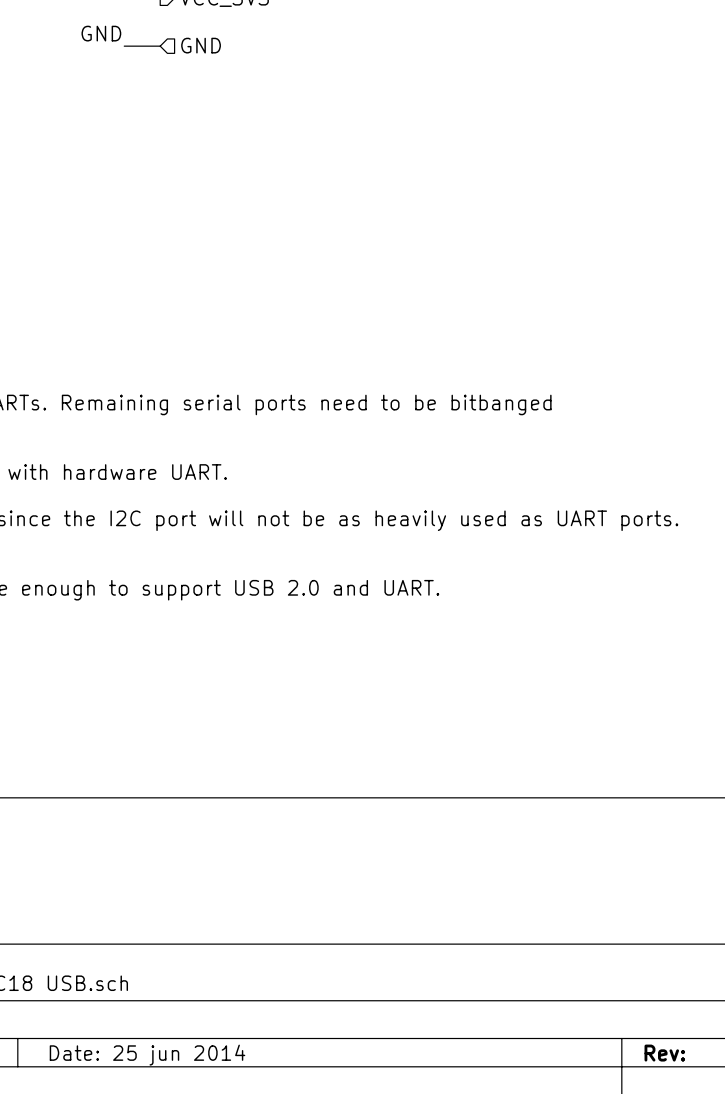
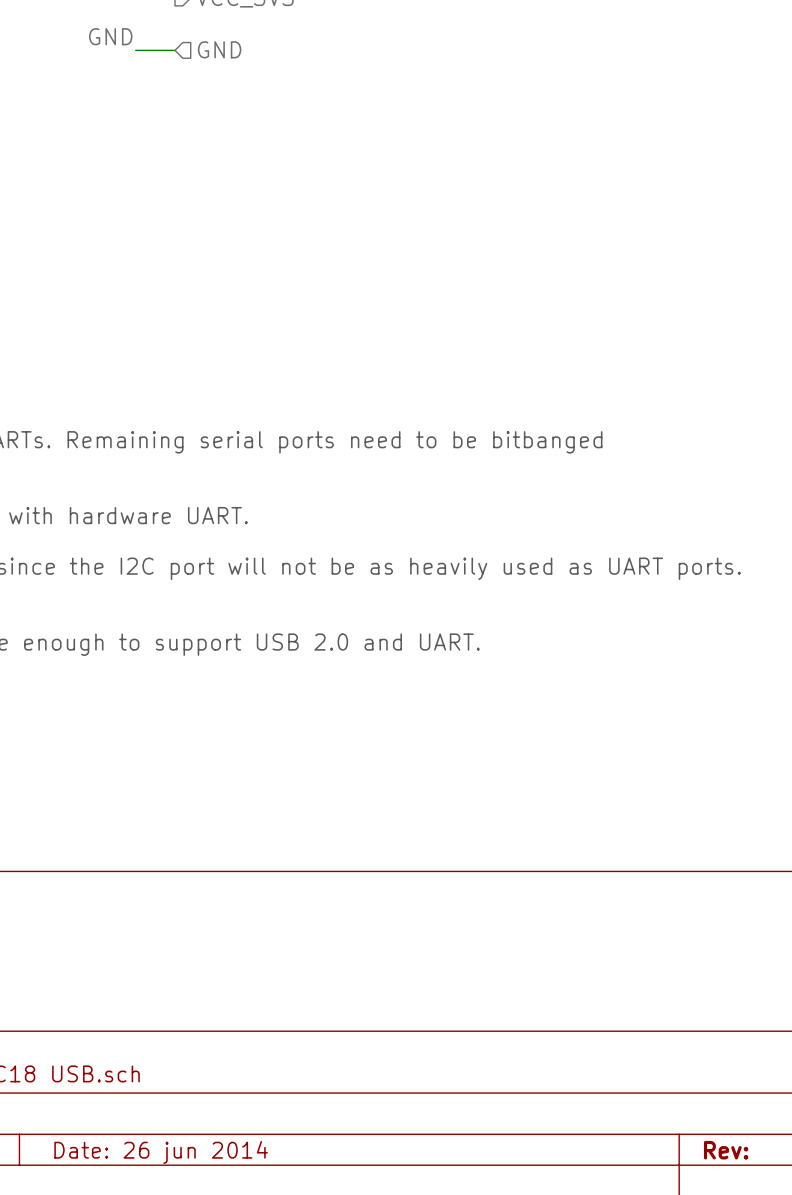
title block: Date: 25 jun 2014 (147, 1055) -> Date: 26 jun 2014 (161, 1152)

